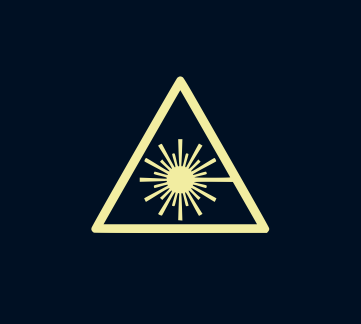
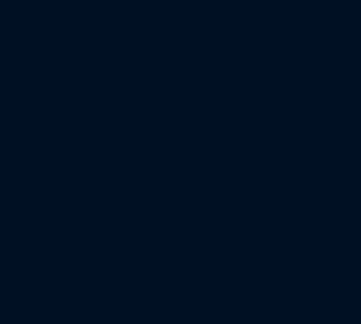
drawing: [91, 76, 270, 234] -> none

